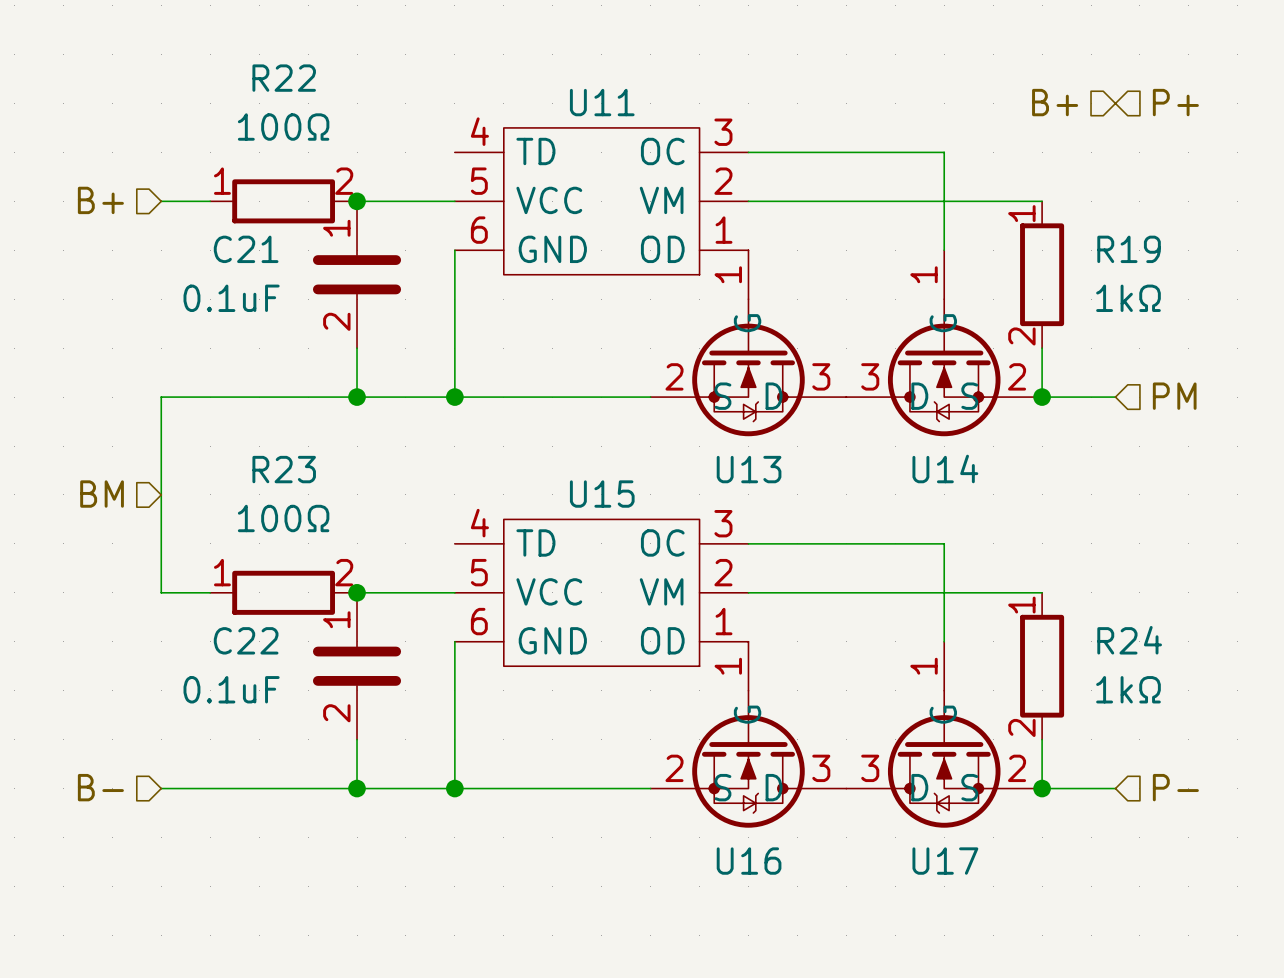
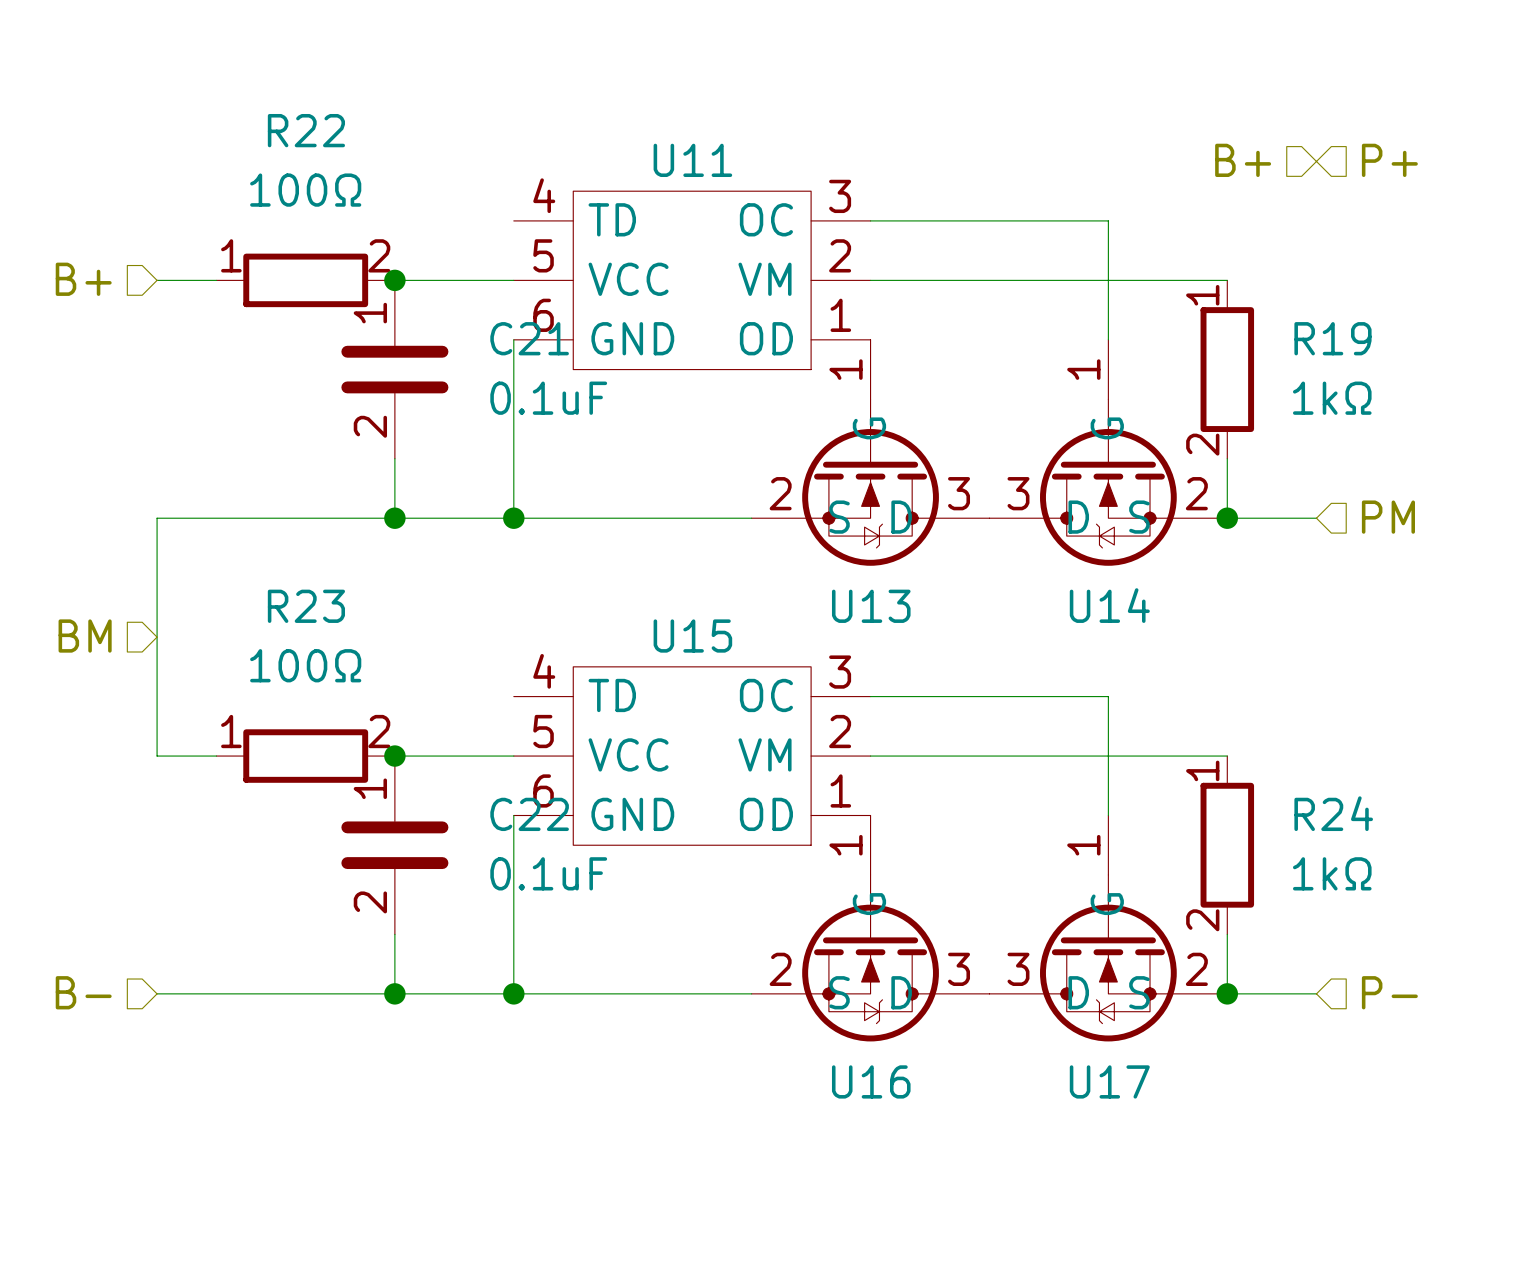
C21 name position: C21 (246, 249) -> C21 (529, 338)
C21 value position: 0.1uF (231, 298) -> 0.1uF (548, 398)
C22 name position: C22 (246, 640) -> C22 (529, 814)
C22 value position: 0.1uF (231, 689) -> 0.1uF (548, 873)

